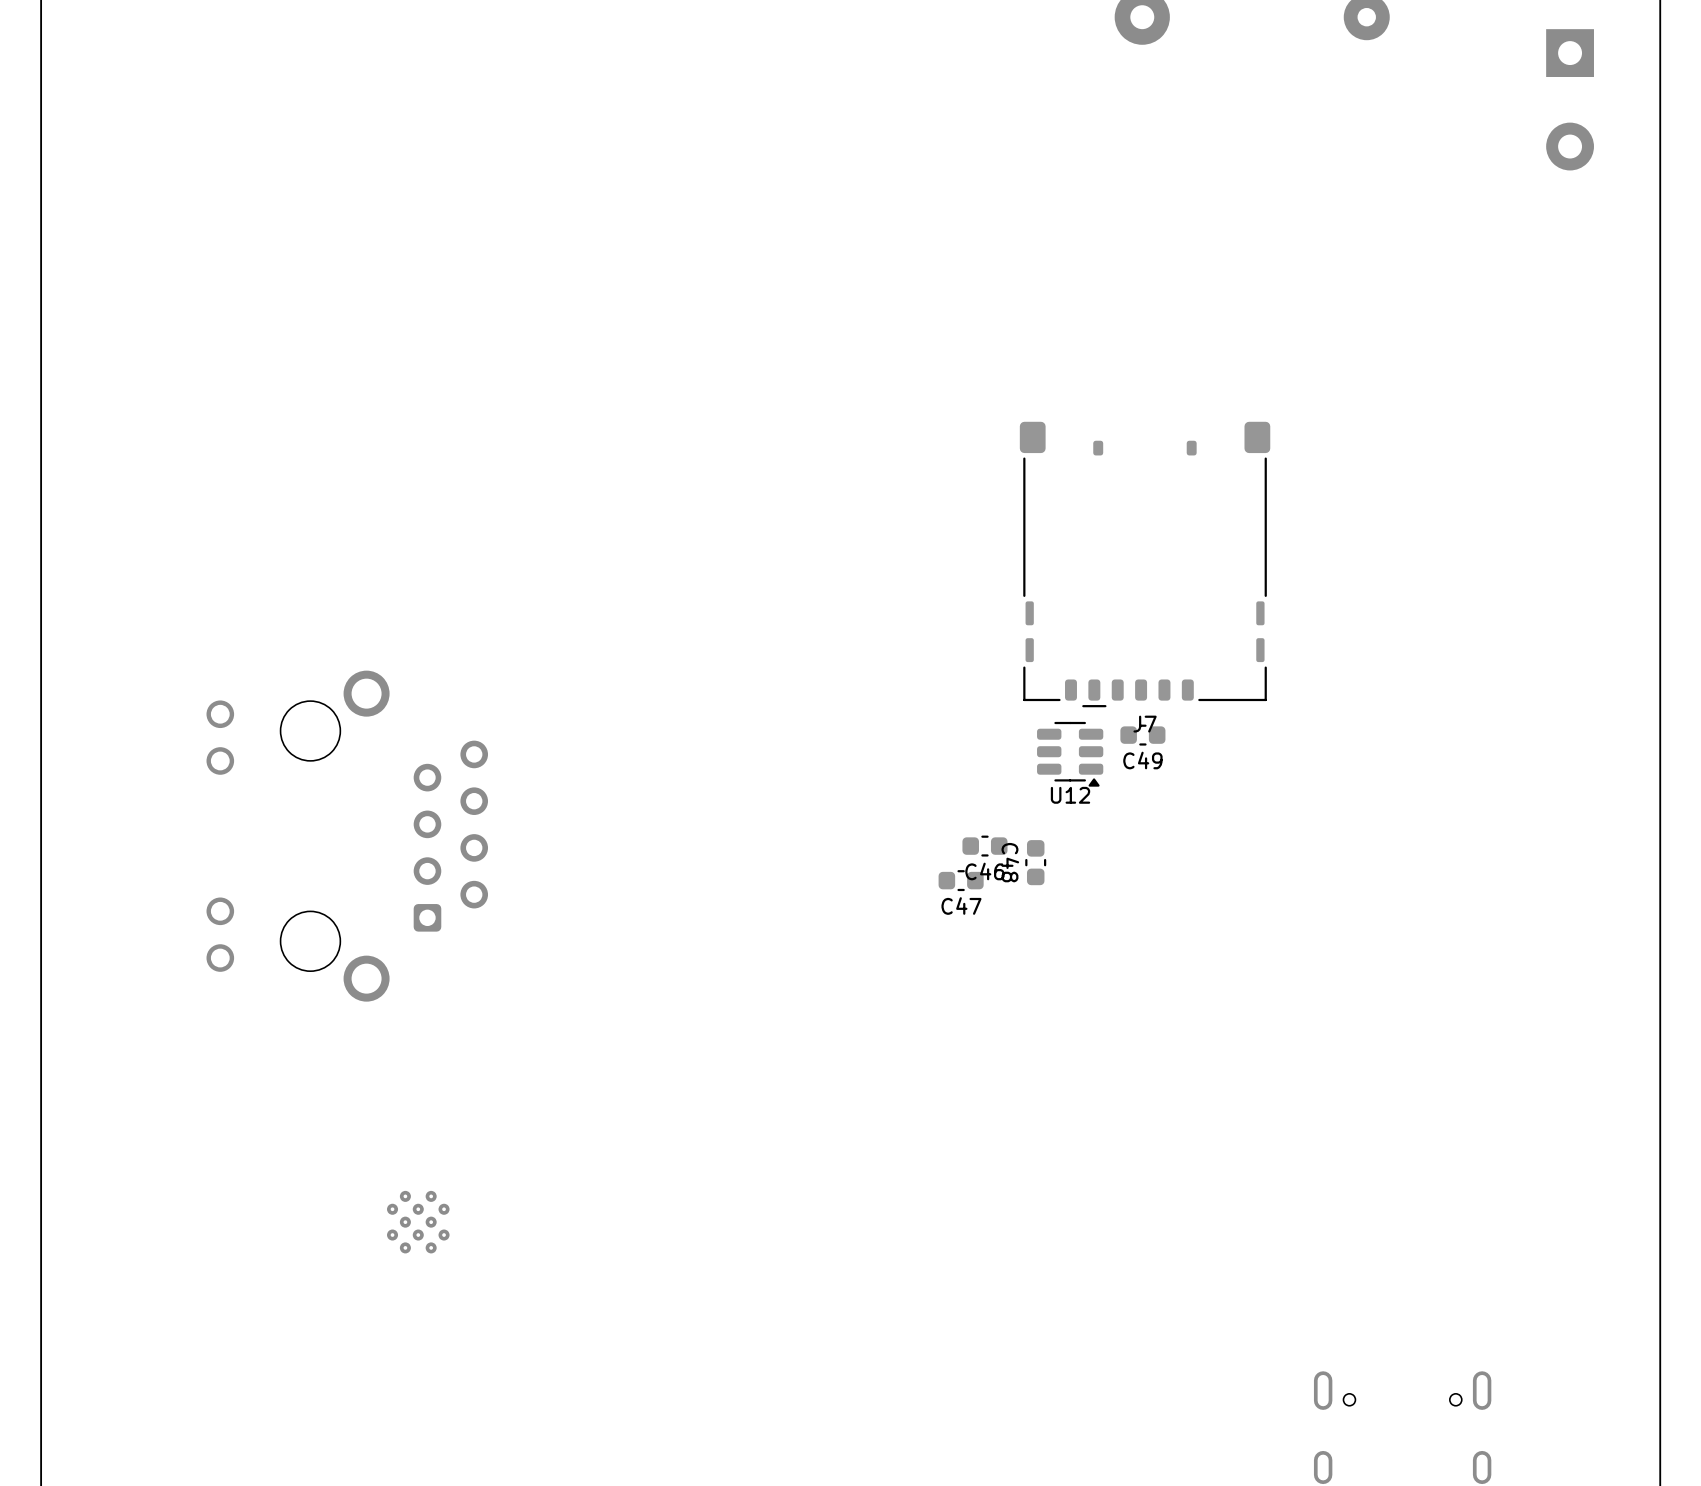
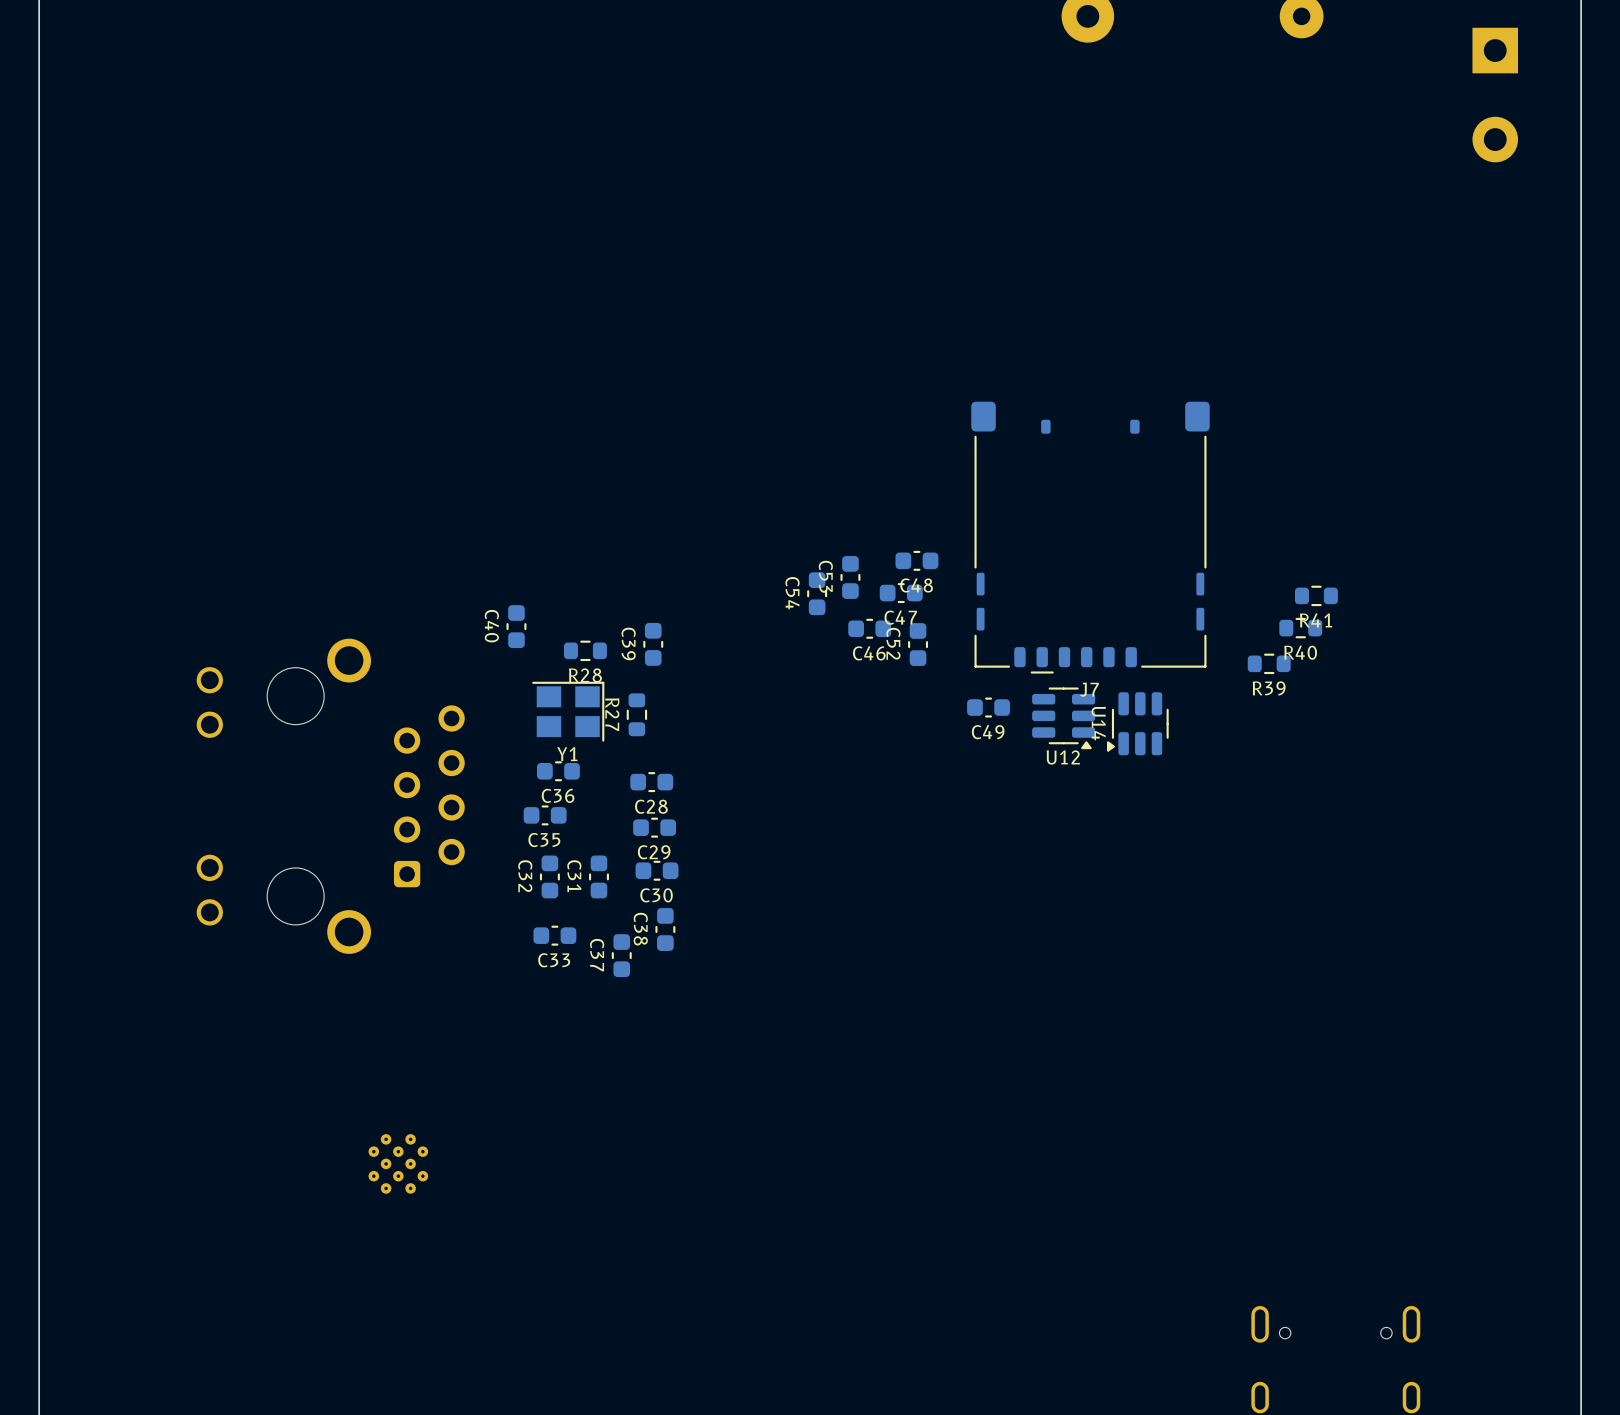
C53: none -> (850, 577)
C54: none -> (817, 593)
R41: none -> (1316, 595)
C40: none -> (516, 626)
R40: none -> (1300, 628)
C39: none -> (653, 644)
C52: none -> (918, 644)
R28: none -> (585, 650)
R39: none -> (1269, 663)
C49 position: (1142, 735) -> (988, 707)
Y1: none -> (568, 711)
R27: none -> (636, 714)
U12 position: (1070, 754) -> (1063, 718)
U14: none -> (1137, 723)
C36: none -> (558, 771)
C28: none -> (651, 782)
C46 position: (984, 846) -> (869, 628)
C35: none -> (545, 815)
C48 name position: C48 (1010, 862) -> C48 (916, 585)
C48 rotation: 0° (1035, 862) -> 90° clockwise (916, 560)
C48 position: (1035, 862) -> (916, 560)
C29: none -> (654, 827)
C47 position: (961, 880) -> (901, 593)
C30: none -> (657, 870)
C32: none -> (549, 876)
C31: none -> (598, 876)
C38: none -> (665, 929)
C33: none -> (554, 935)
C37: none -> (621, 955)

